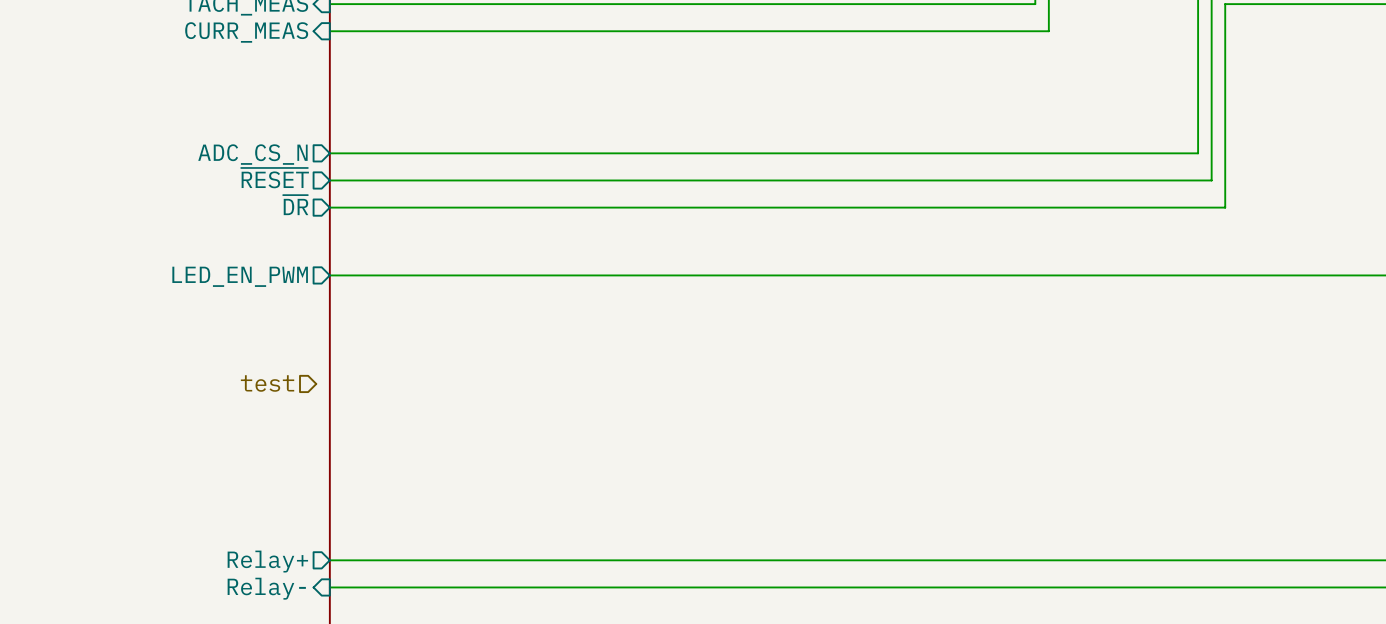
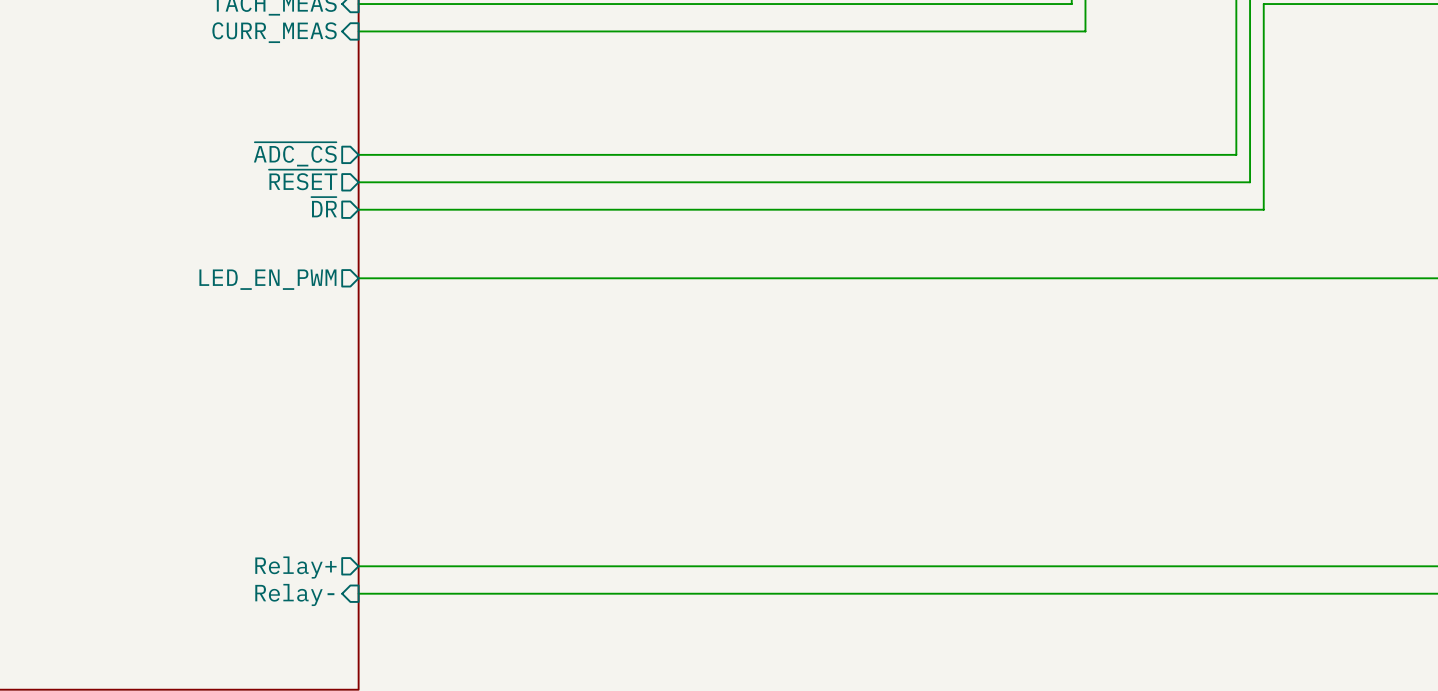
sheet pin: ADC_CS_N (252, 154) -> ~{ADC_CS} (295, 154)
hierarchical label: test (267, 383) -> none

